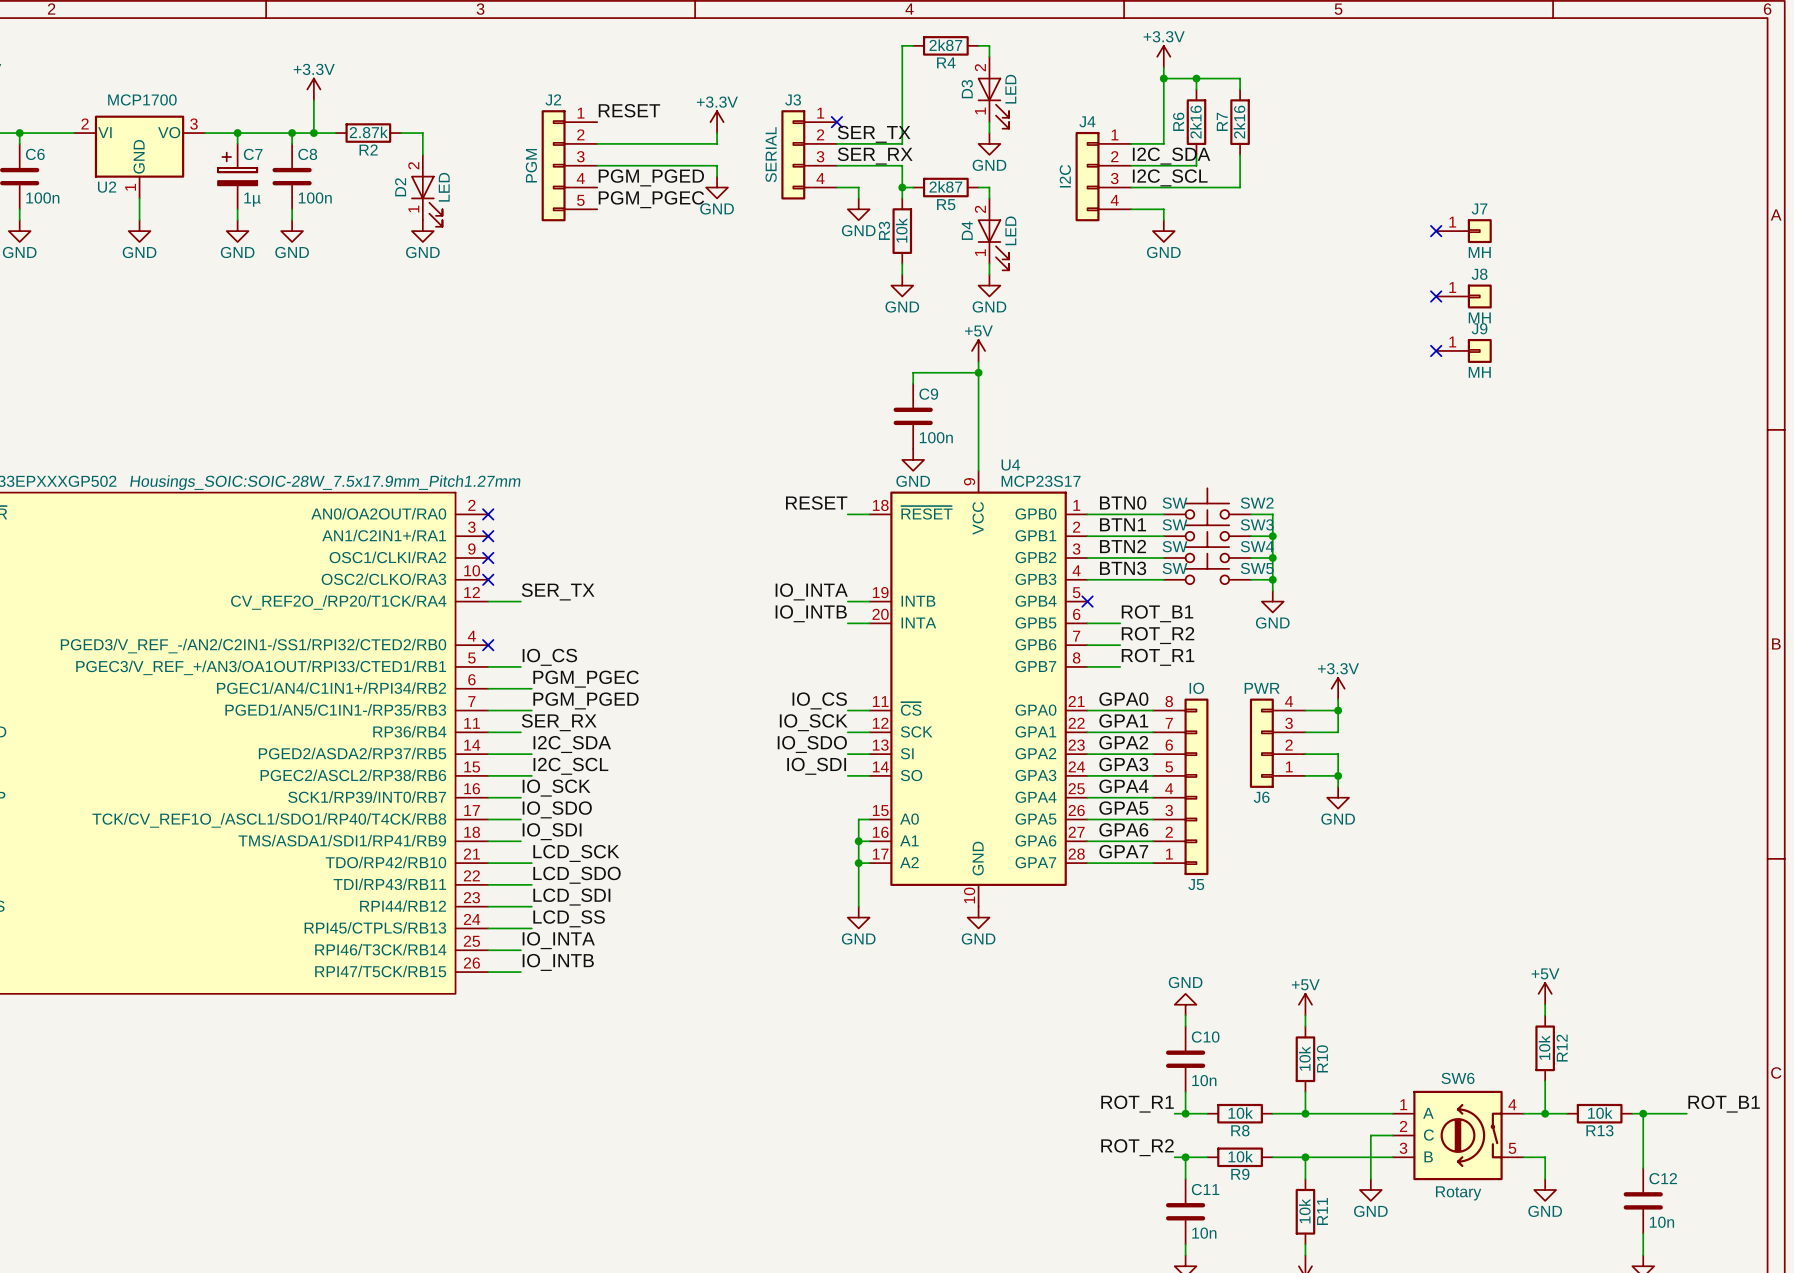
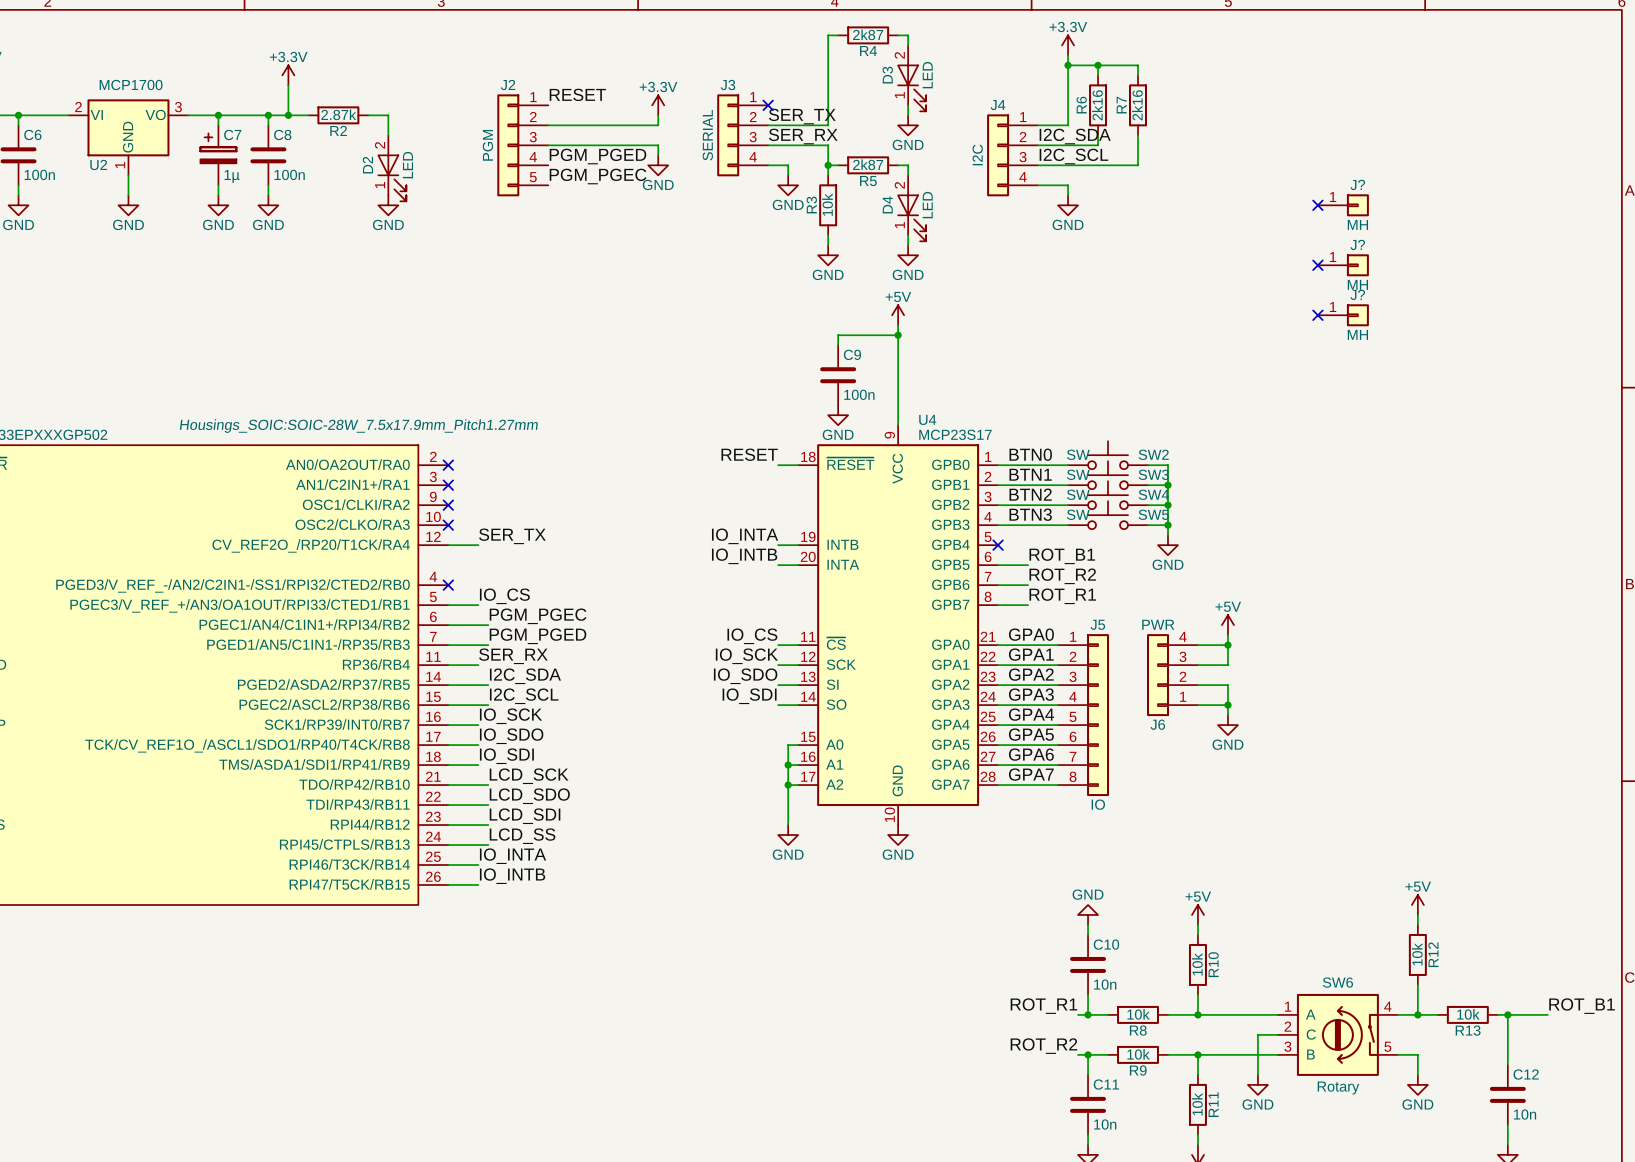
J7 name: J7 (1479, 208) -> J? (1357, 184)
J8 name: J8 (1479, 274) -> J? (1357, 244)
J9 name: J9 (1479, 328) -> J? (1357, 294)
part text position: Housings_SOIC:SOIC-28W_7.5x17.9mm_Pitch1.27mm (325, 482) -> Housings_SOIC:SOIC-28W_7.5x17.9mm_Pitch1.27mm (358, 426)
power symbol: +3.3V (1338, 688) -> +5V (1227, 625)
J5 flip: as is (1196, 786) -> up-down (1098, 715)

